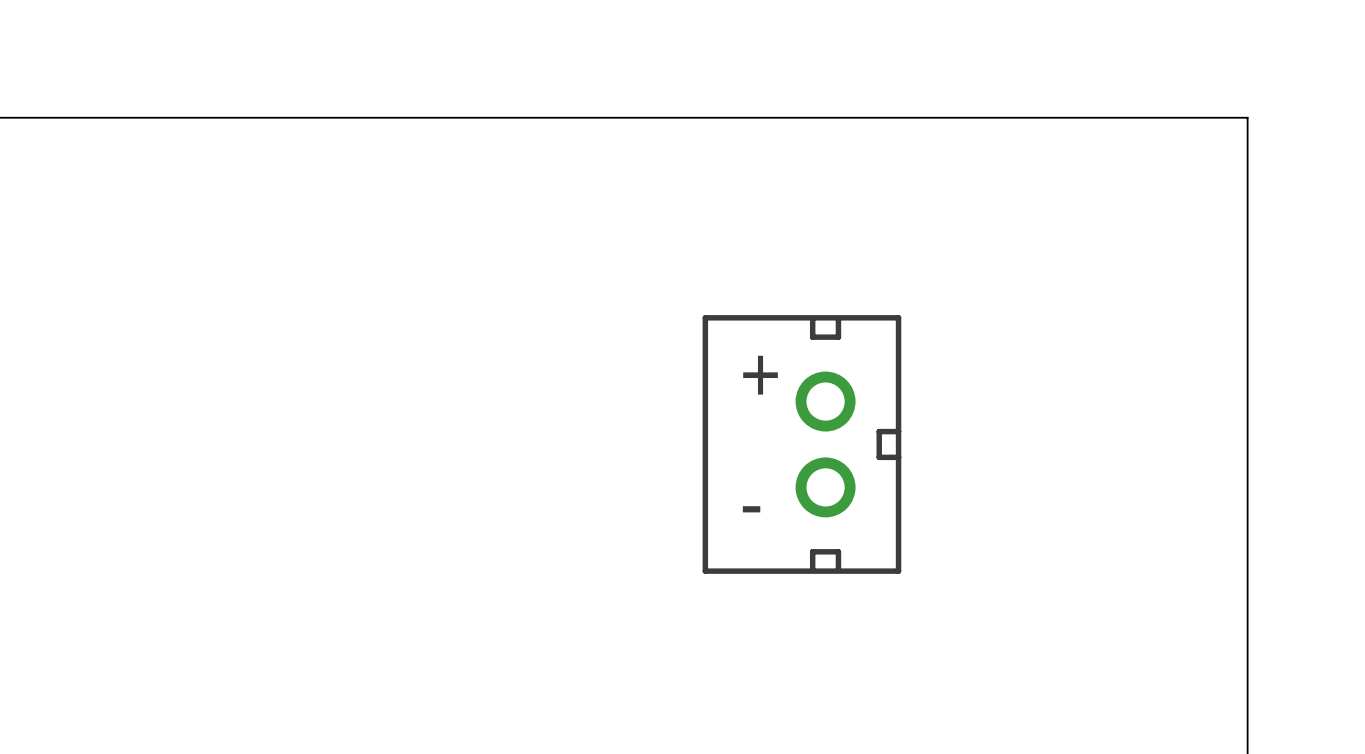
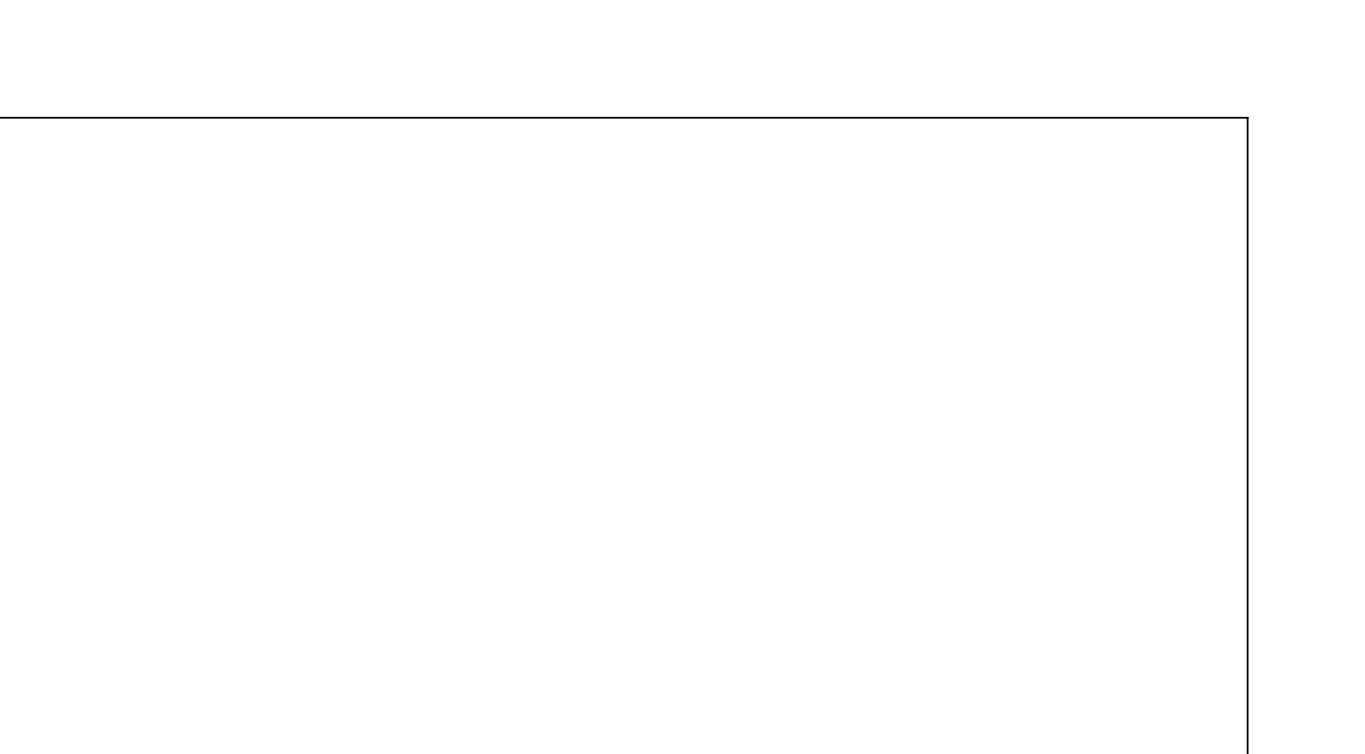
part: (801, 444) -> none

